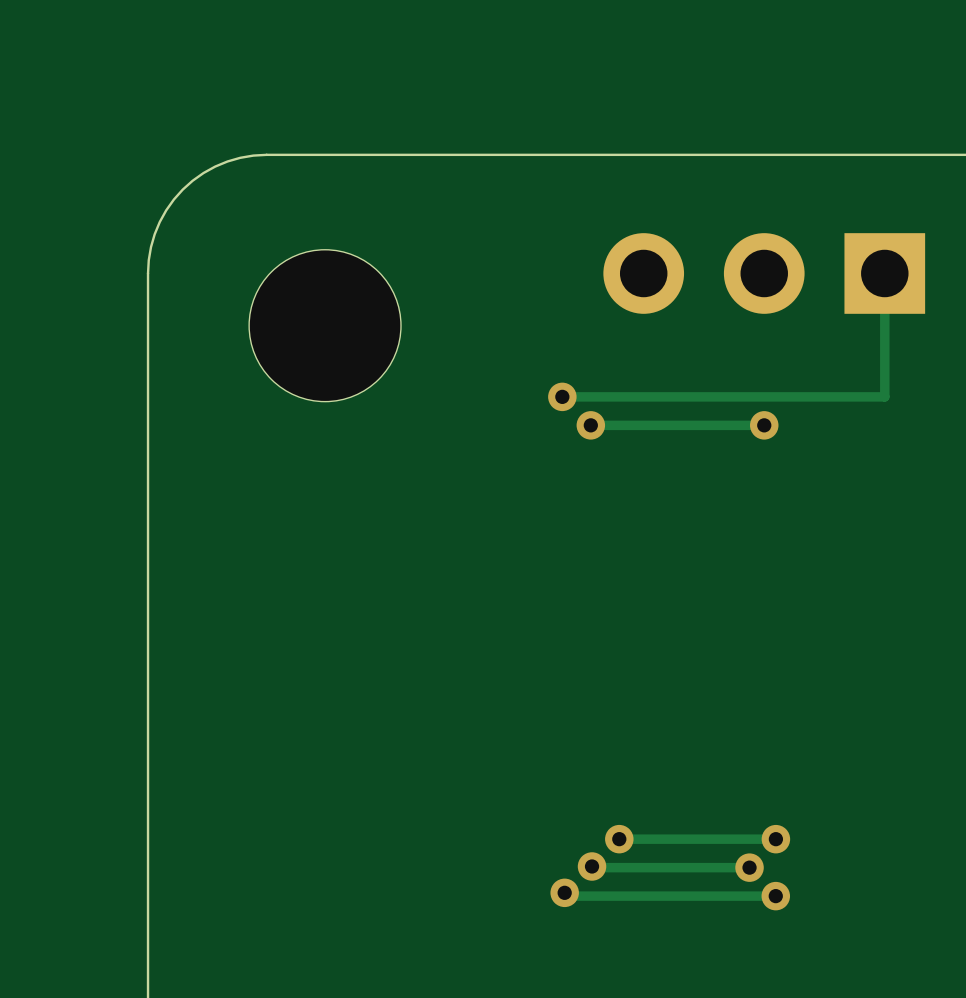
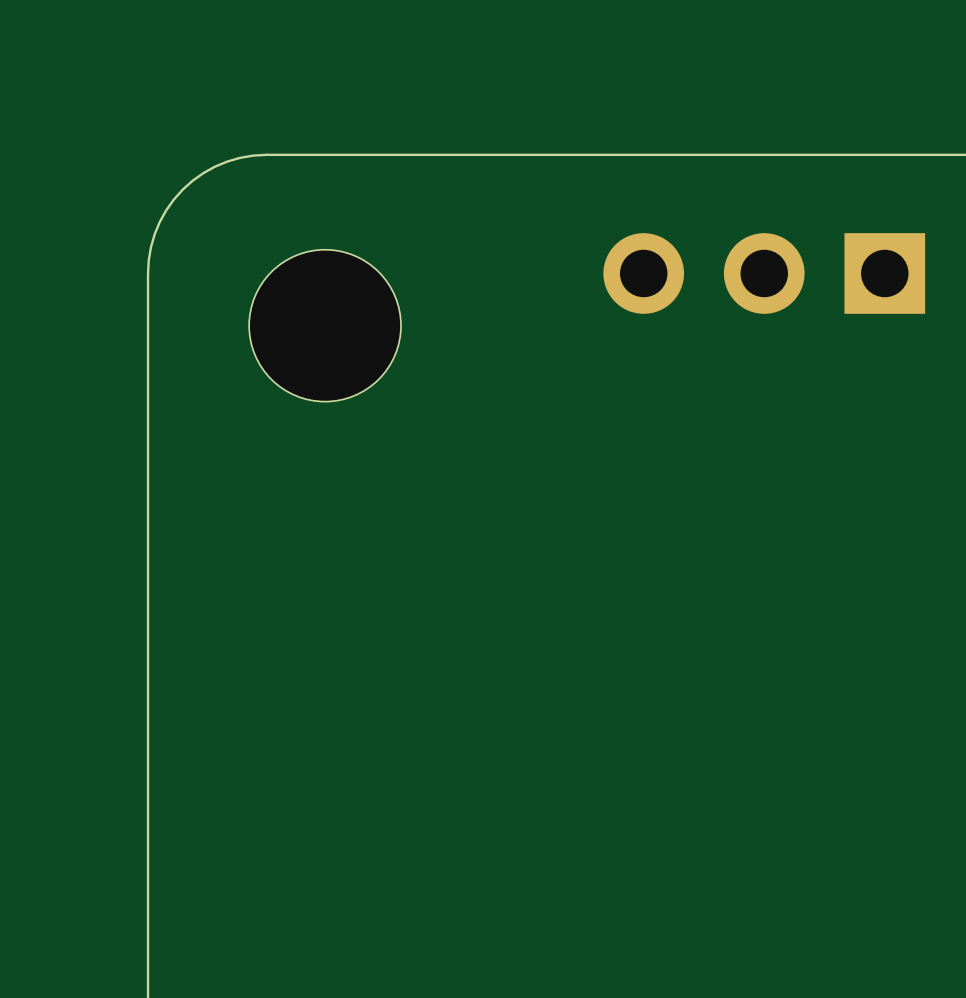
track: (884, 273) (884, 396) (562, 396) -> none
via: (562, 396) -> none
via: (590, 425) -> none
track: (764, 425) (590, 425) -> none
via: (764, 425) -> none
via: (619, 839) -> none
track: (775, 839) (618, 839) -> none
via: (775, 839) -> none
track: (592, 866) (589, 867) (749, 867) -> none
via: (592, 866) -> none
via: (749, 867) -> none
track: (564, 892) (563, 896) (775, 896) -> none
via: (564, 892) -> none
via: (775, 896) -> none

